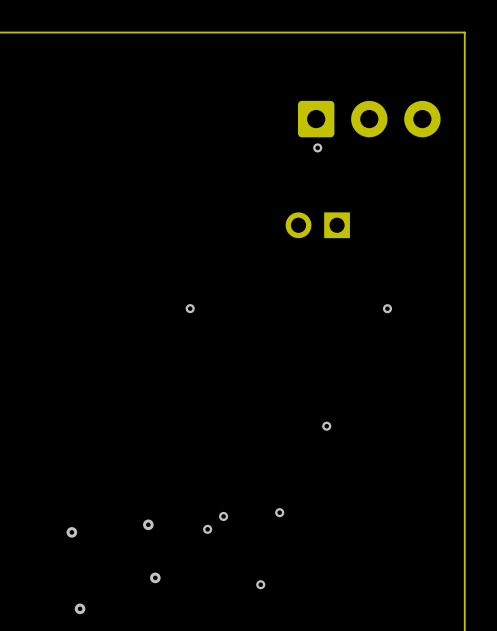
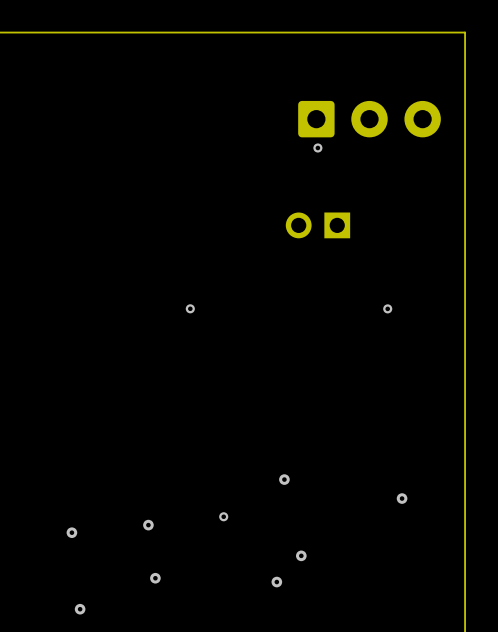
via: (326, 426) -> none
via: none -> (284, 479)
via: none -> (402, 498)
via: (279, 512) -> none
via: (207, 529) -> none
via: none -> (301, 555)
via: none -> (276, 582)
via: (260, 584) -> none

